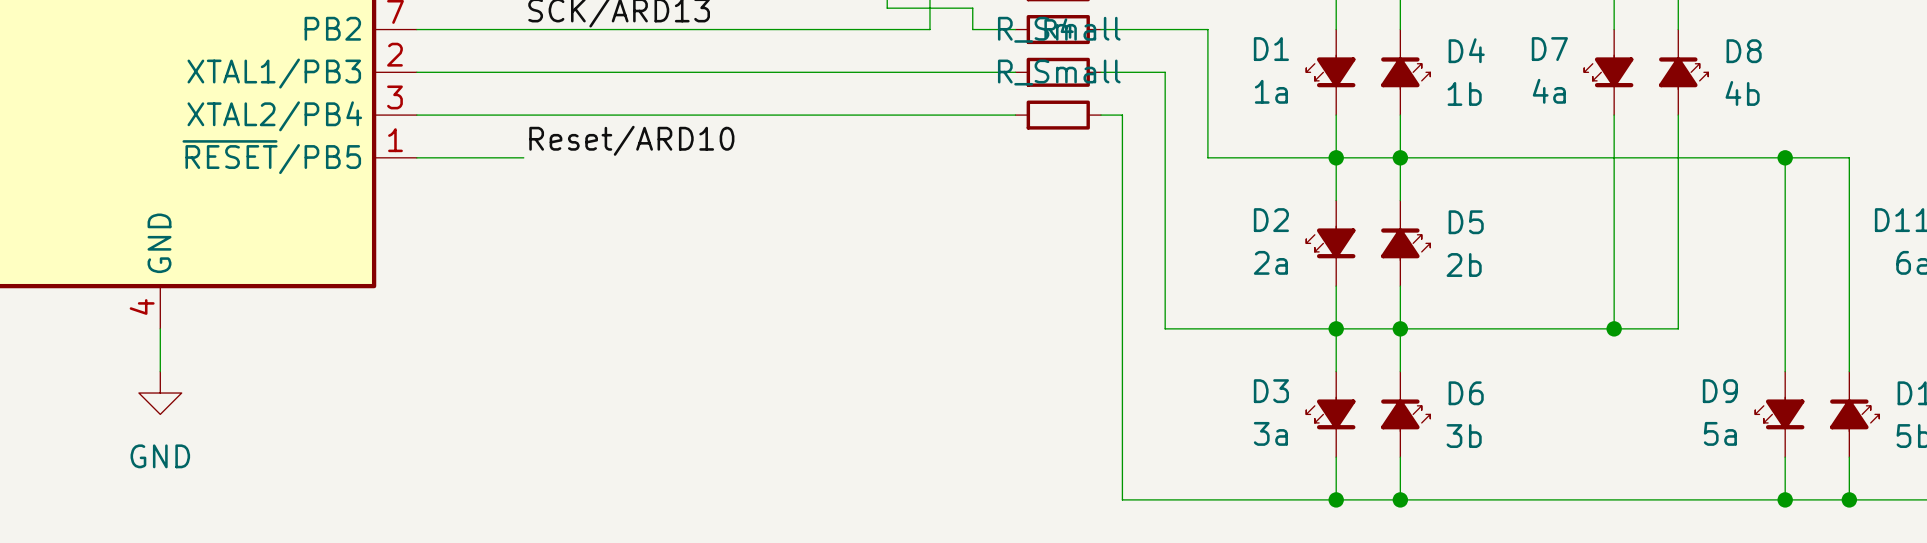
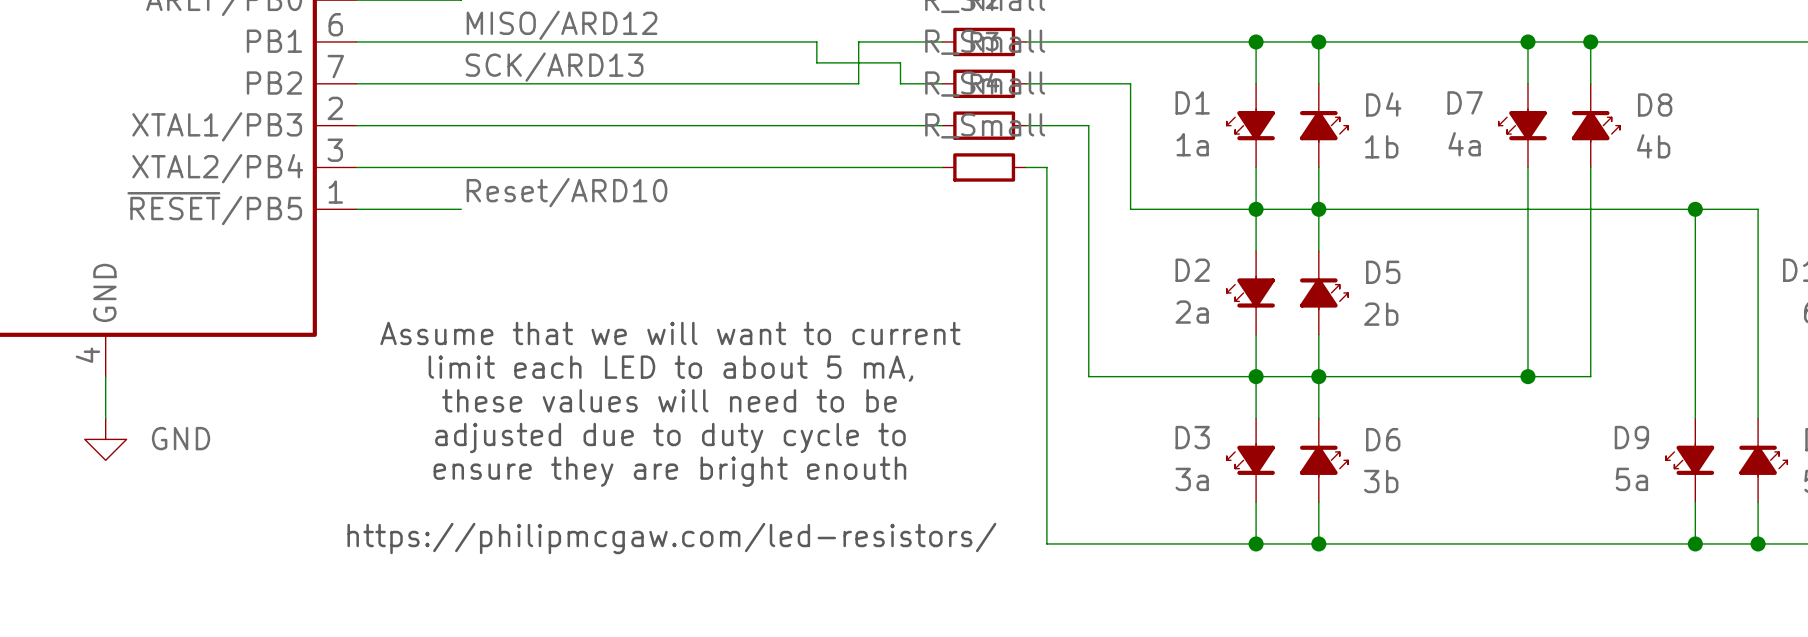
text: none -> Assume that we will want to current (670, 333)
text: none -> limit each LED to about 5 mA, (670, 368)
text: none -> these values will need to be (669, 400)
text: none -> adjusted due to duty cycle to (670, 437)
text: none -> ensure they are bright enouth (669, 471)
power symbol text position: GND (160, 456) -> GND (181, 438)
text: none -> https://philipmcgaw.com/led-resistors/ (671, 538)

